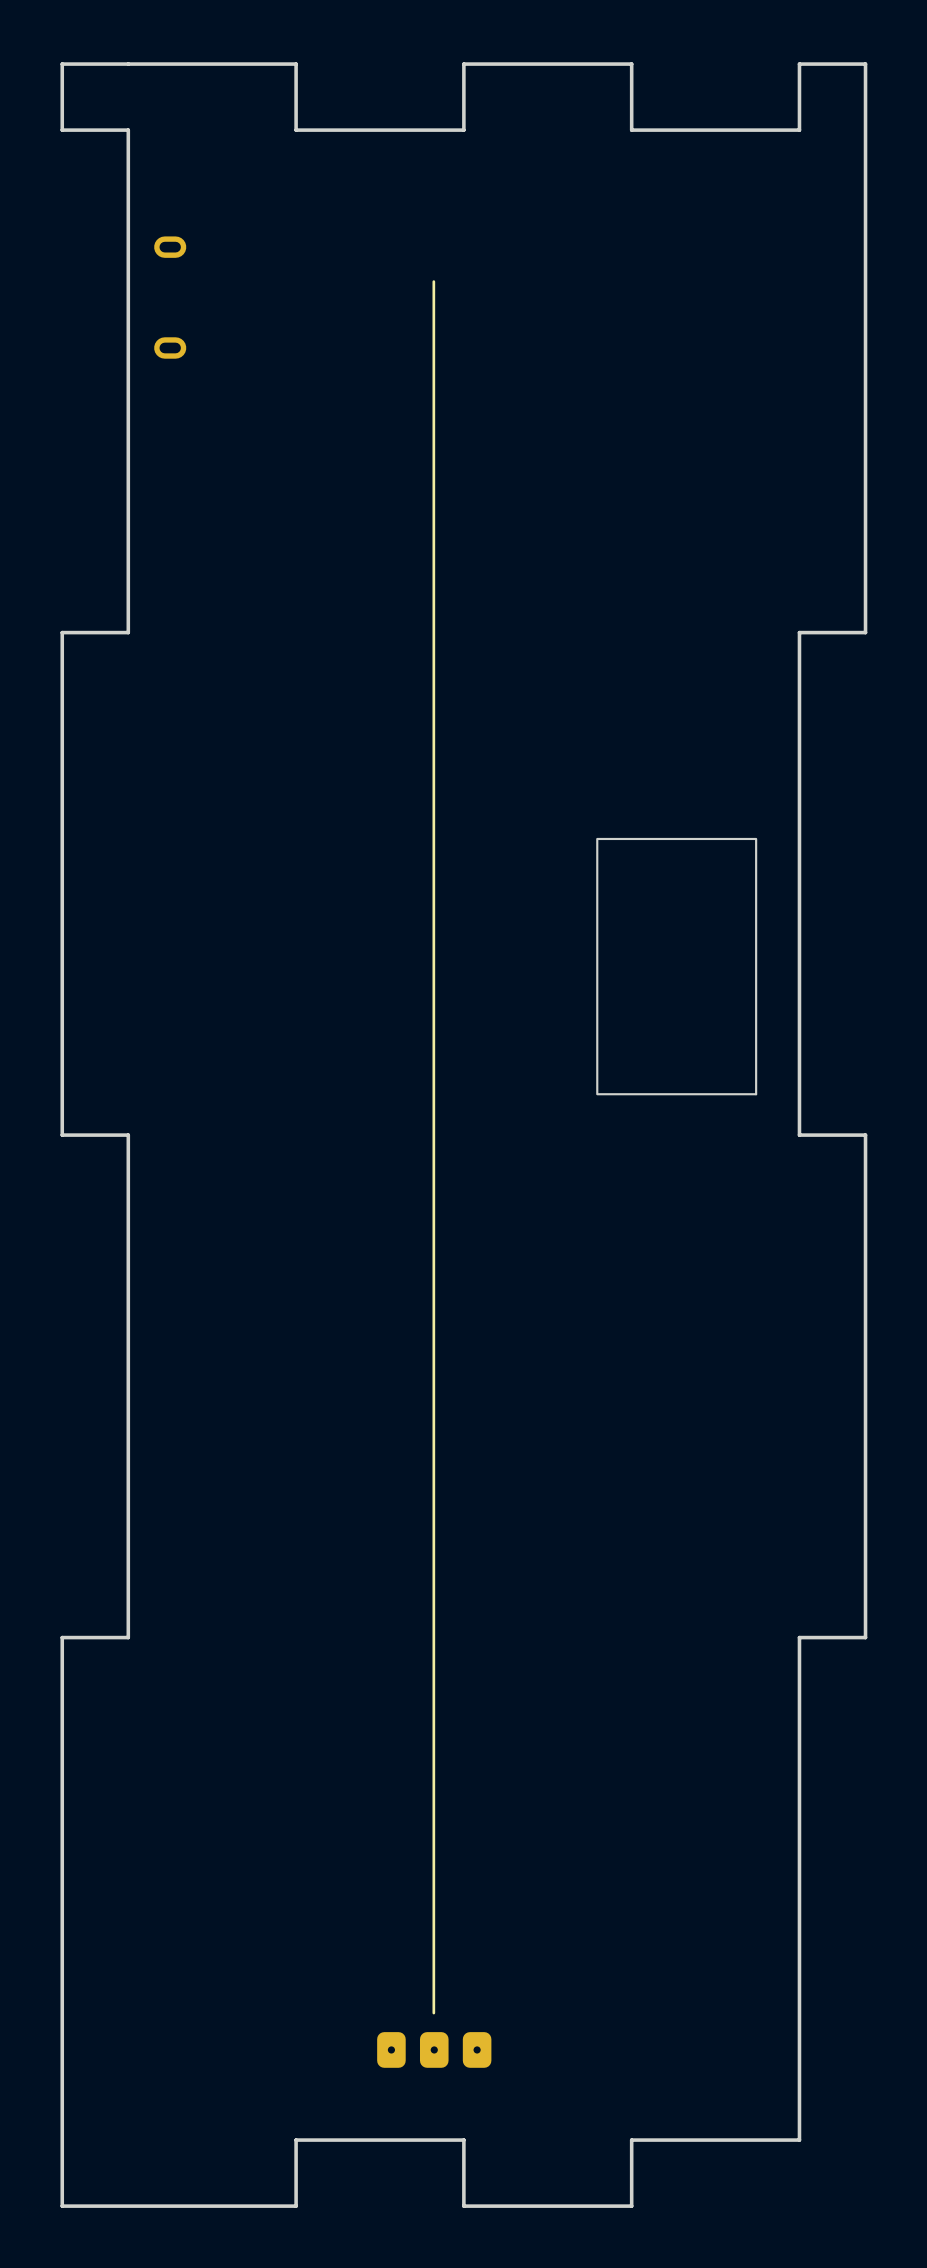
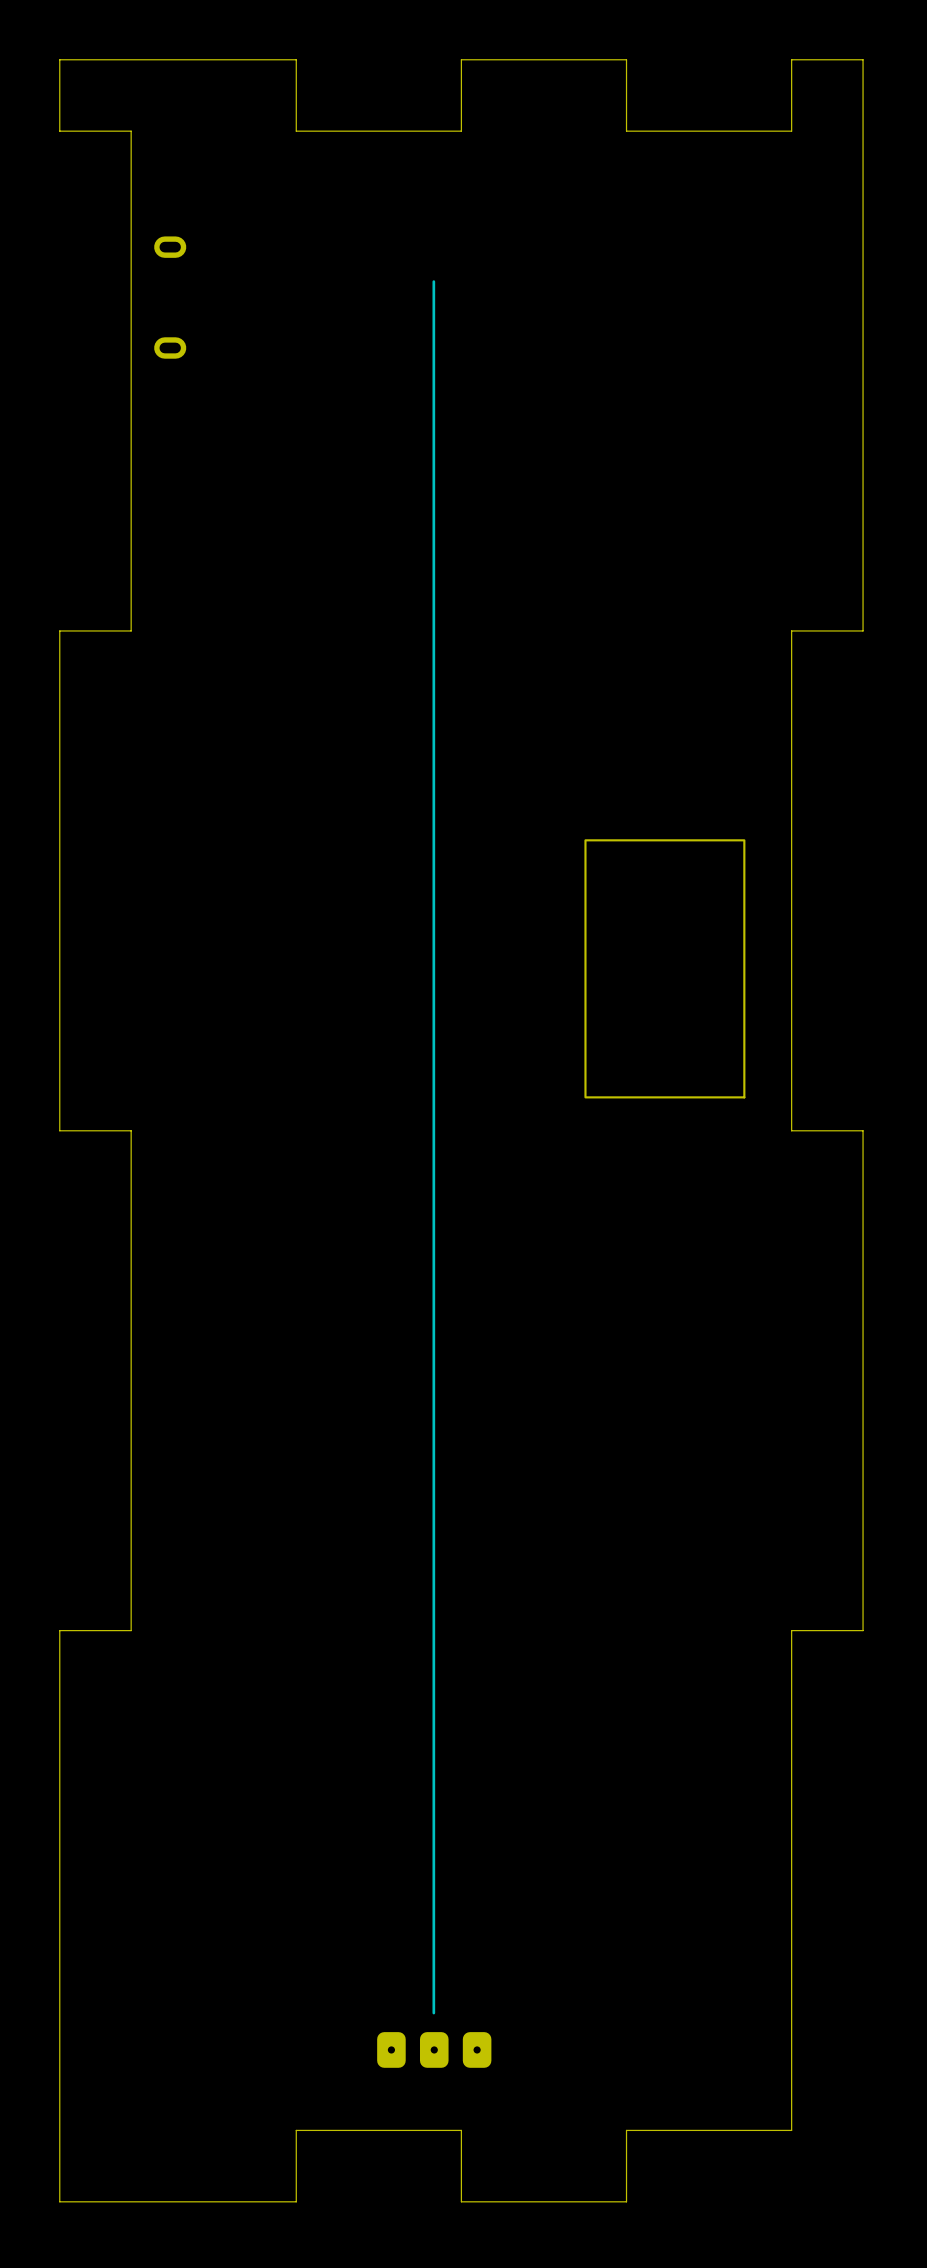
board edge: (62, 64) (62, 130) (128, 130) (128, 632) (62, 632) (62, 1135) (128, 1135) (128, 1637) (62, 1637) (62, 2206) (296, 2206) (296, 2140) (463, 2140) (463, 2206) (631, 2206) (631, 2140) (799, 2140) (799, 1637) (865, 1637) (865, 1135) (799, 1135) (799, 632) (865, 632) (865, 64) (799, 64) (799, 130) (631, 130) (631, 64) (463, 64) (463, 130) (296, 130) (296, 64) (62, 64) -> (59, 59) (59, 131) (131, 131) (131, 630) (59, 630) (59, 1130) (131, 1130) (131, 1630) (59, 1630) (59, 2201) (296, 2201) (296, 2130) (461, 2130) (461, 2201) (626, 2201) (626, 2130) (791, 2130) (791, 1630) (863, 1630) (863, 1130) (791, 1130) (791, 630) (863, 630) (863, 59) (791, 59) (791, 131) (626, 131) (626, 59) (461, 59) (461, 131) (296, 131) (296, 59) (59, 59)
part footprint: [596, 837, 758, 1096] -> [584, 839, 746, 1099]

